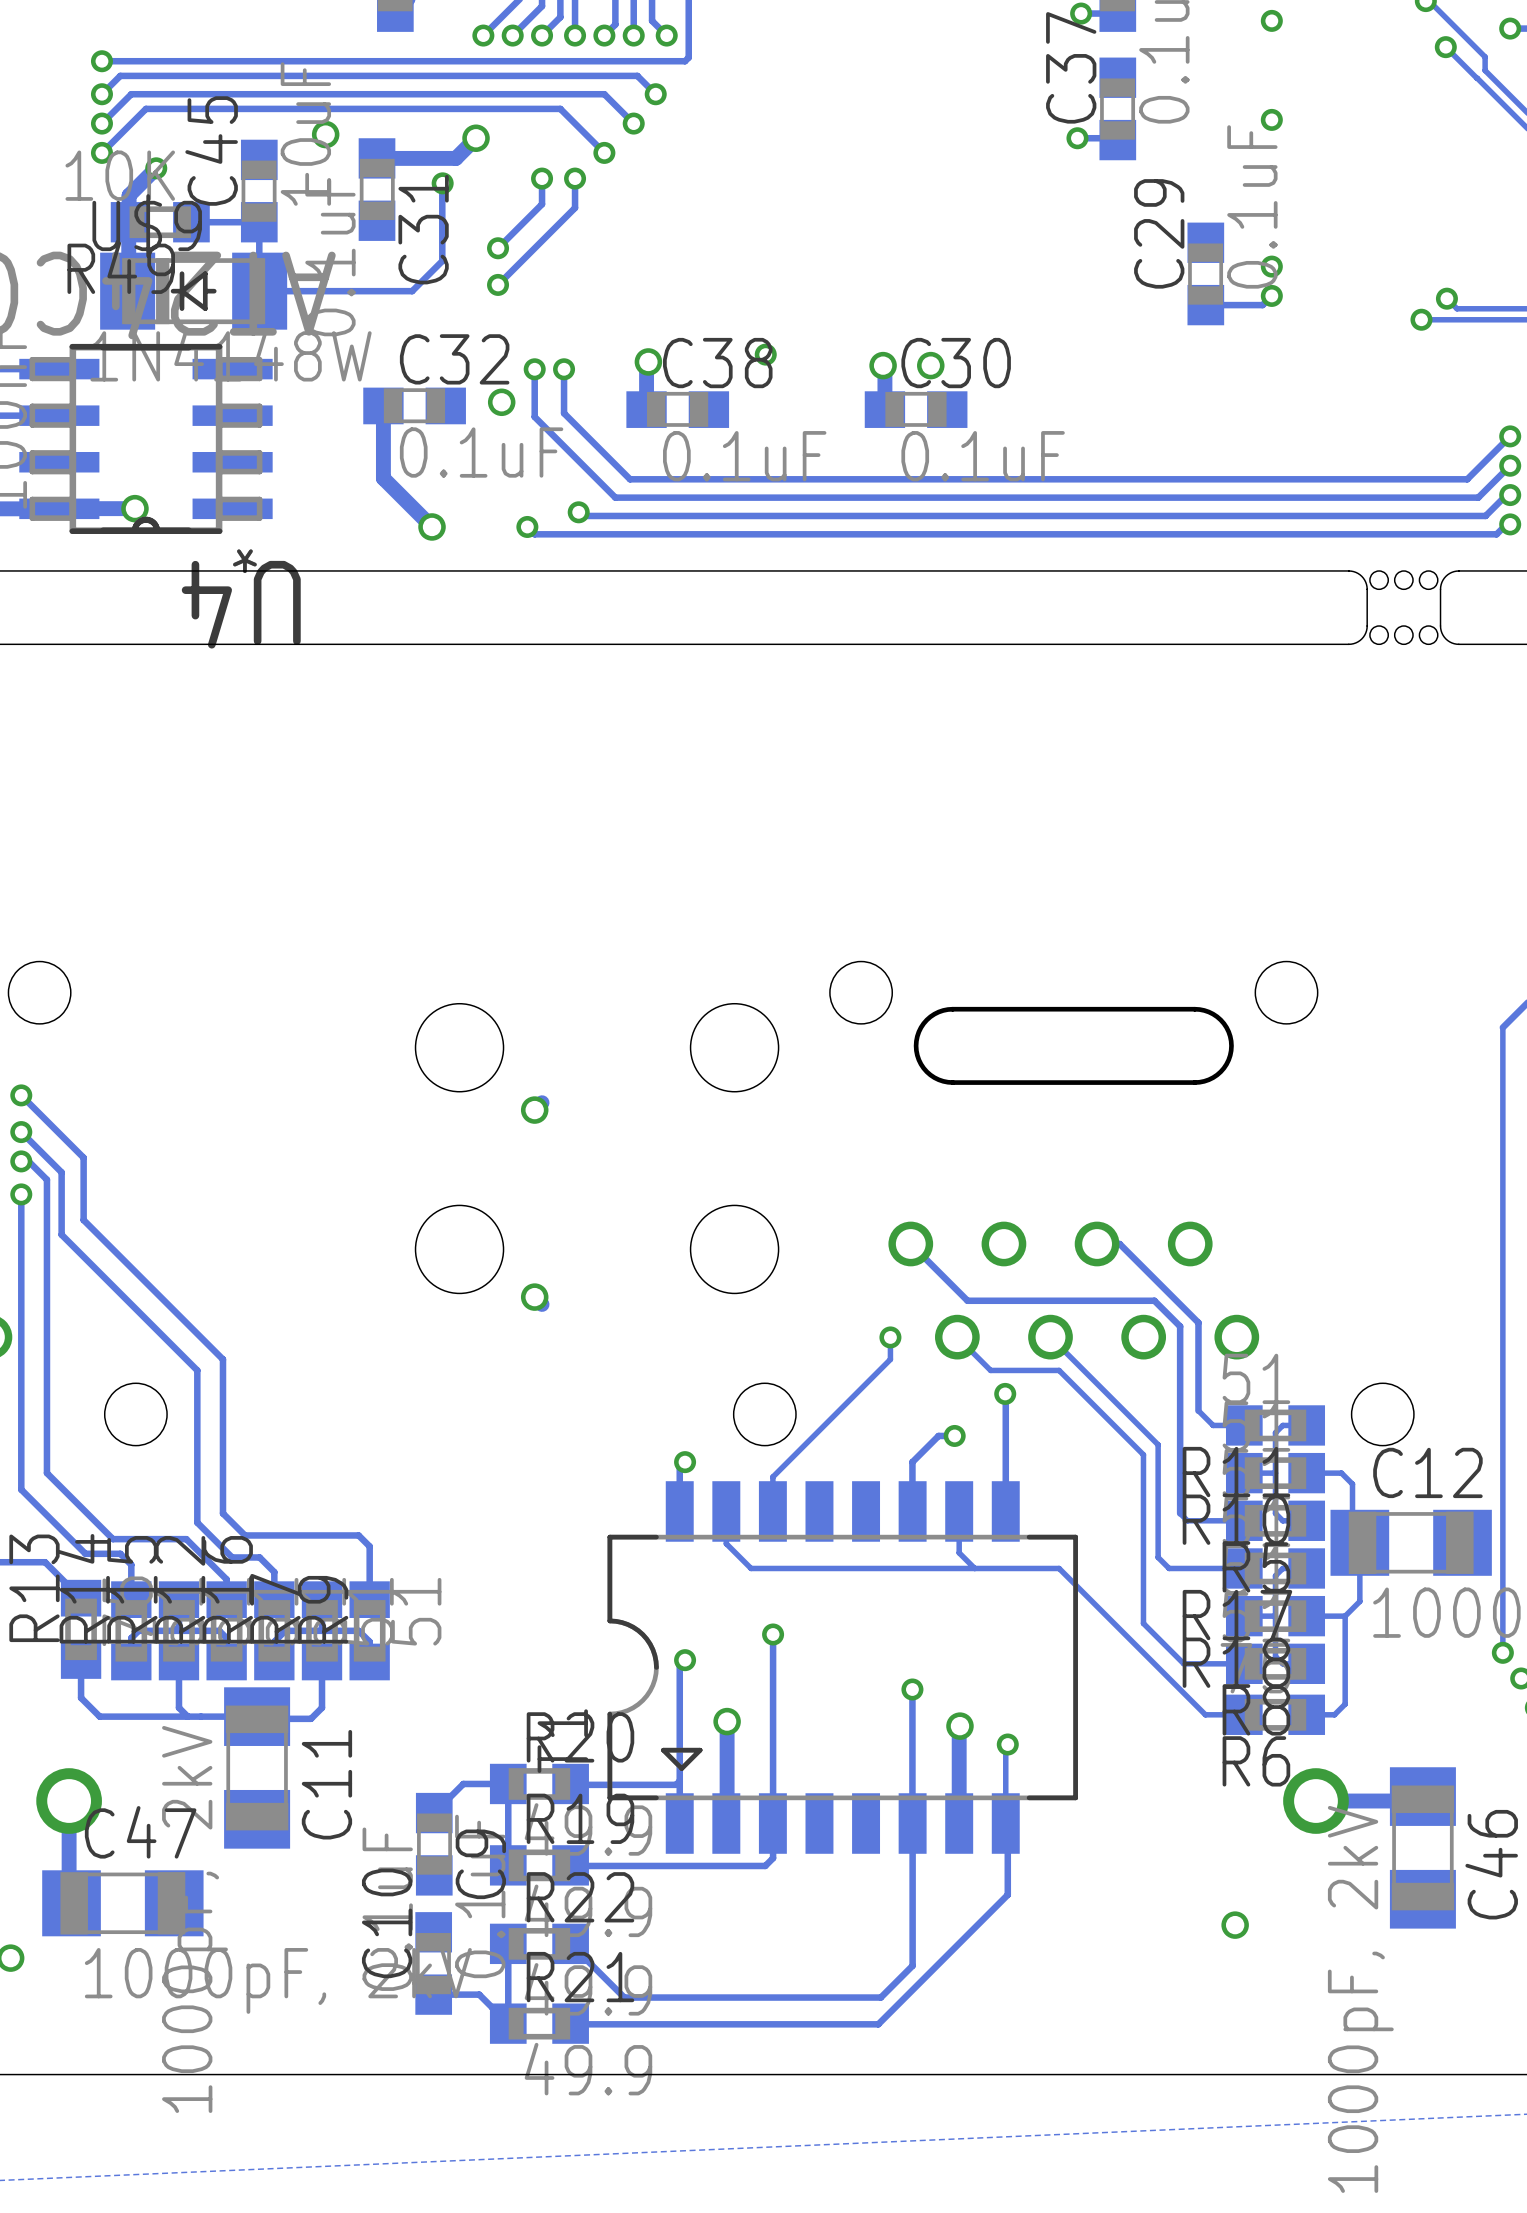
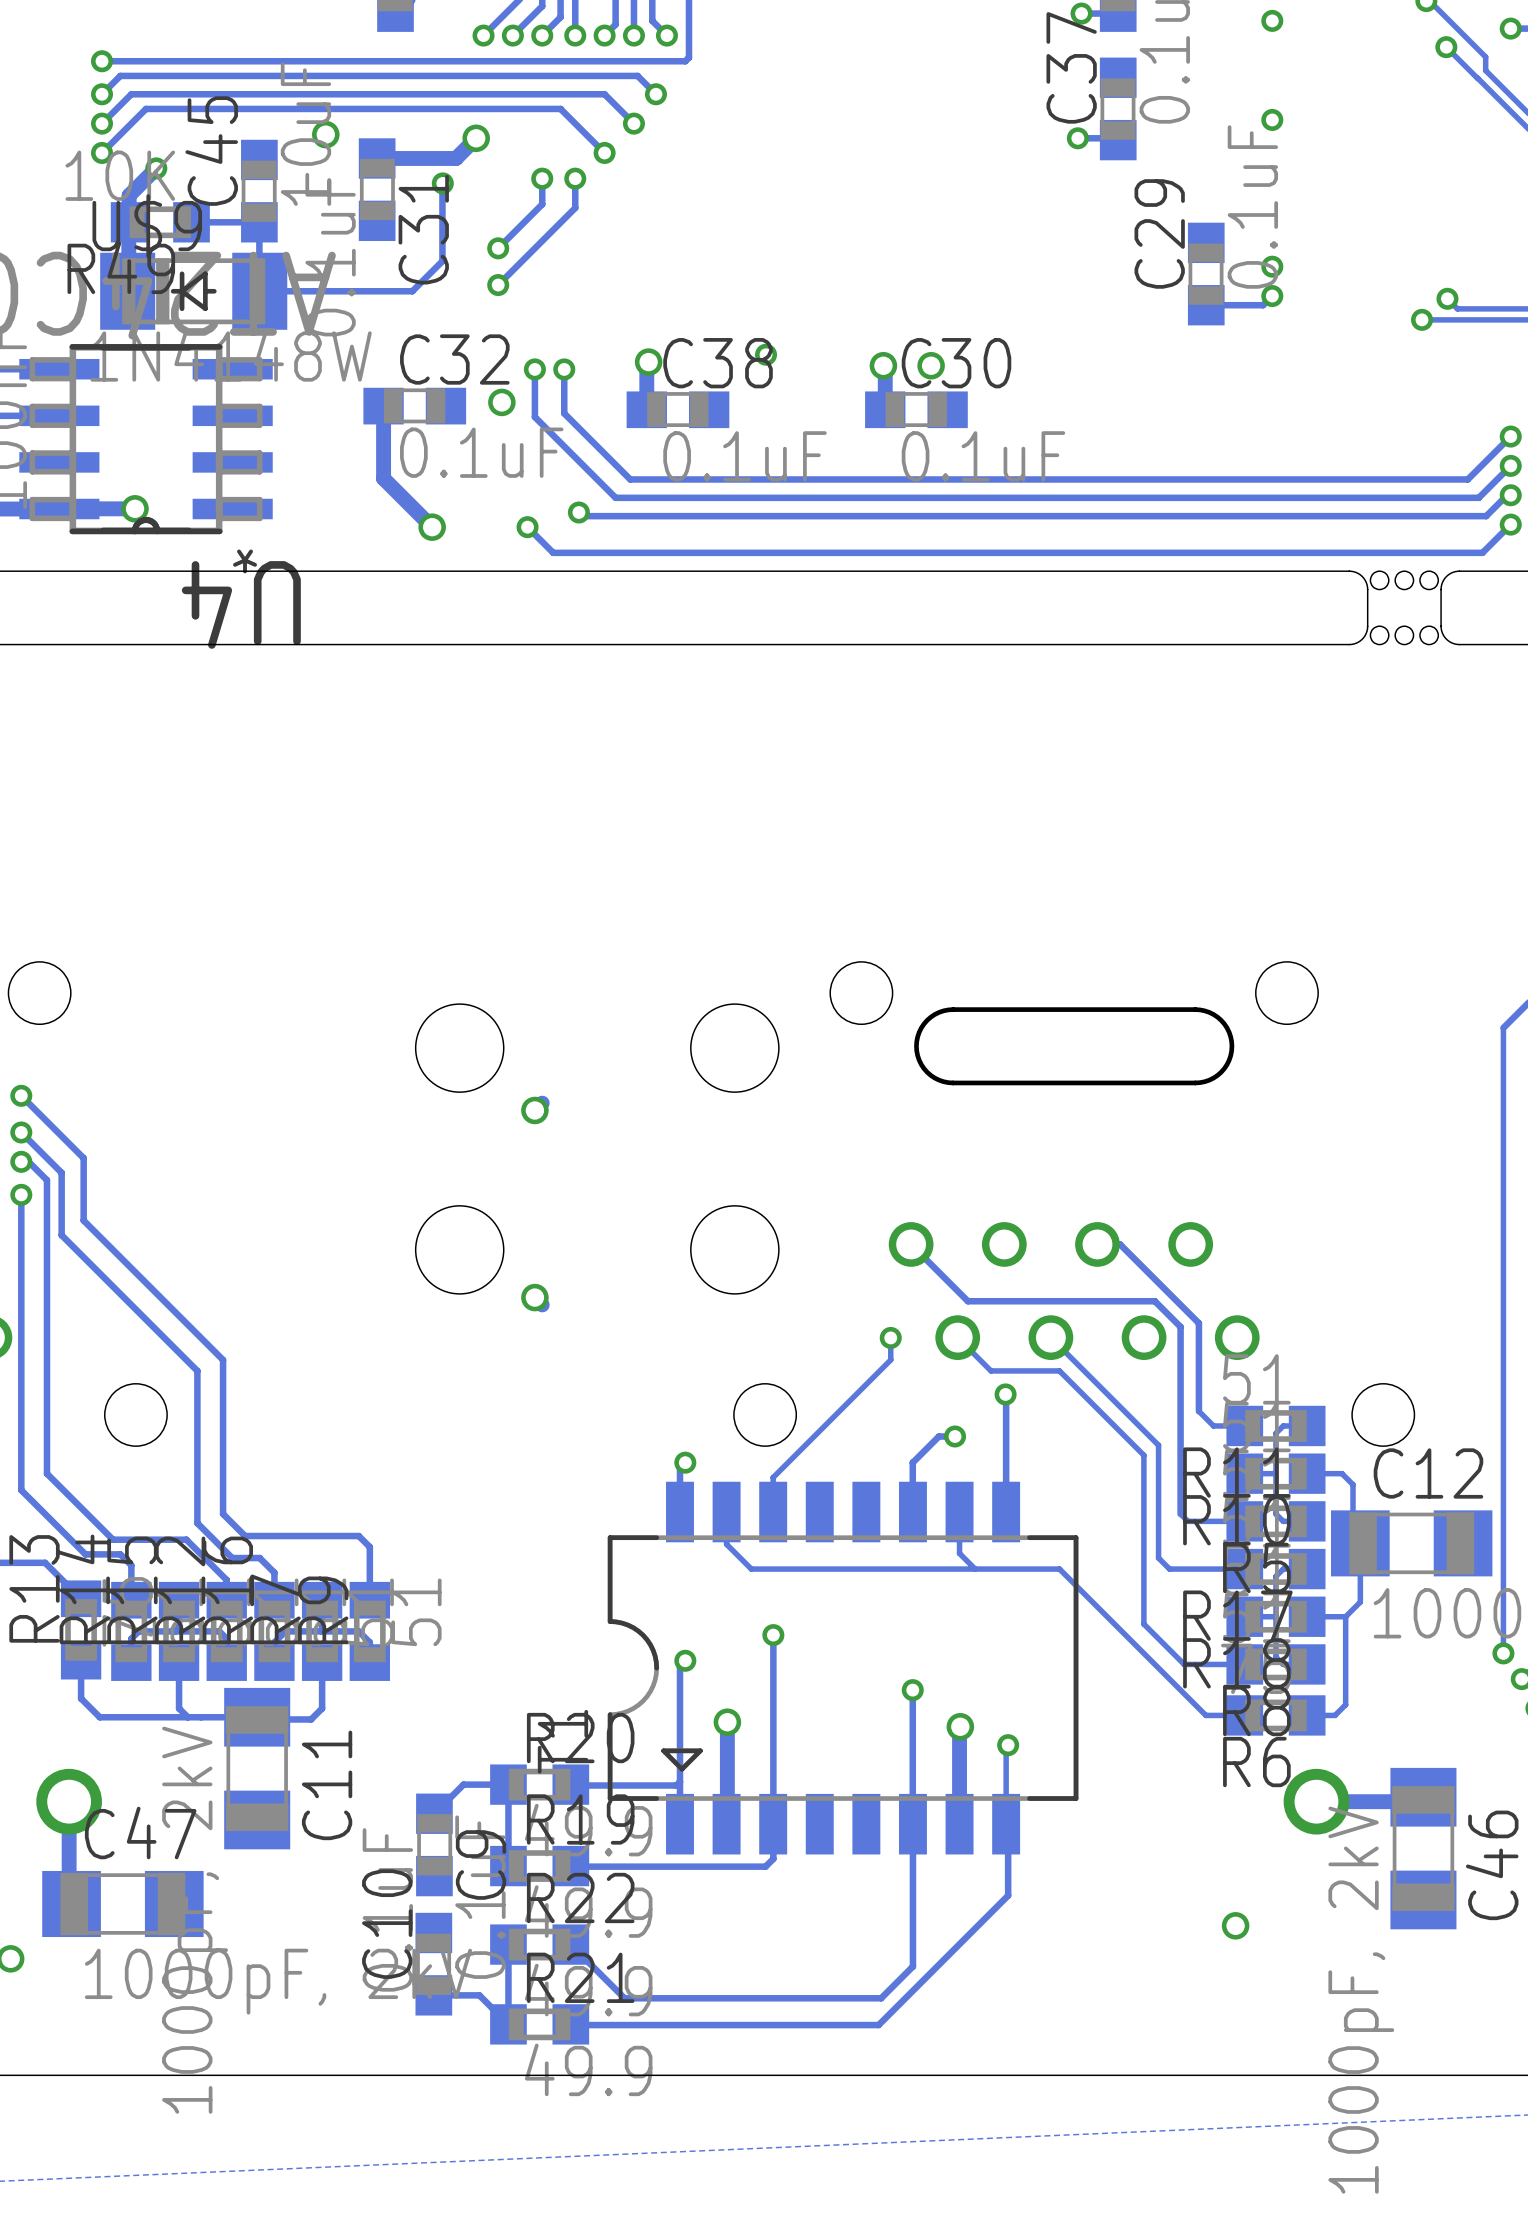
track: (1510, 524) (1506, 524) (1496, 534) (534, 534) -> (1510, 524) (1482, 552) (553, 552) (534, 534)

